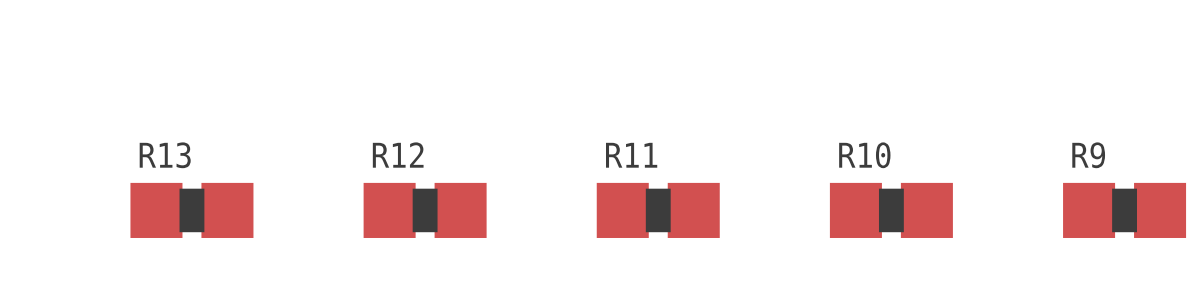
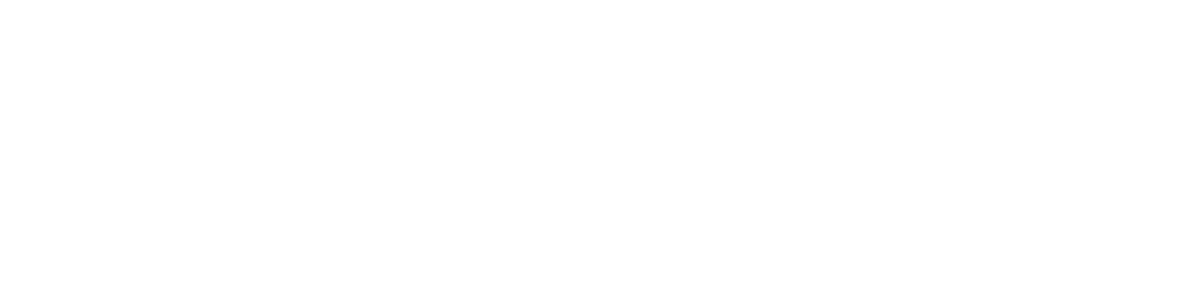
R13: (191, 210) -> none
R12: (425, 210) -> none
R11: (658, 210) -> none
R10: (891, 210) -> none
R9: (1124, 210) -> none

